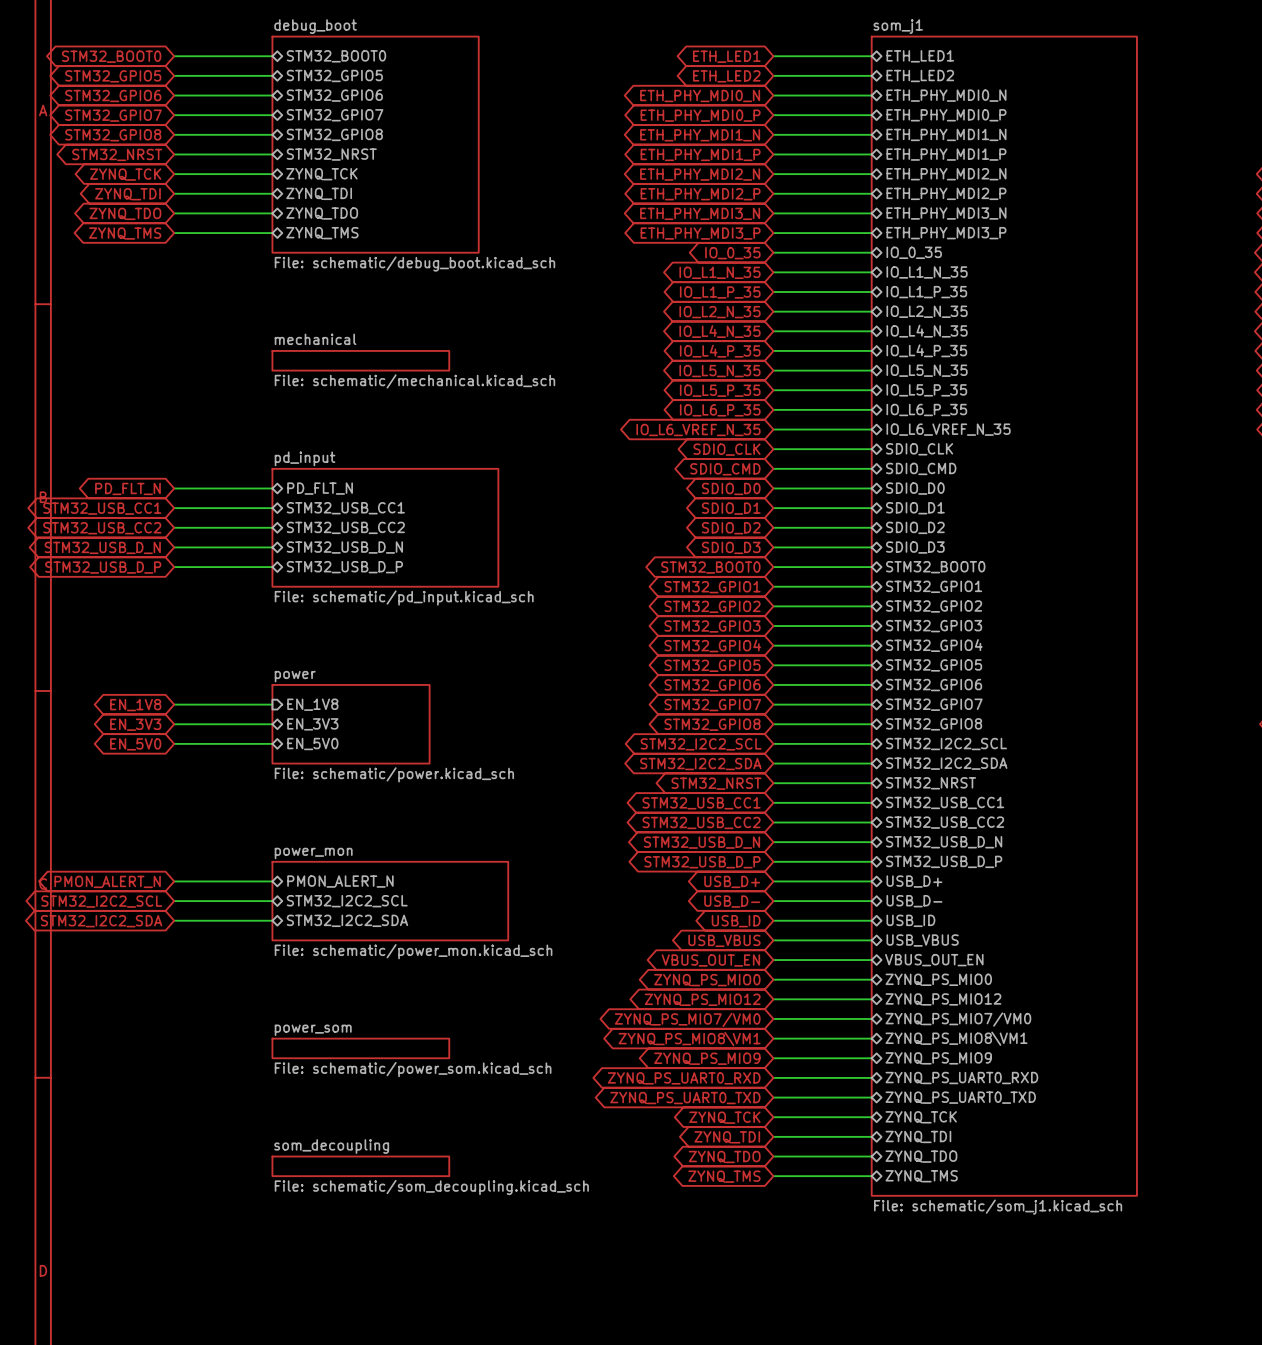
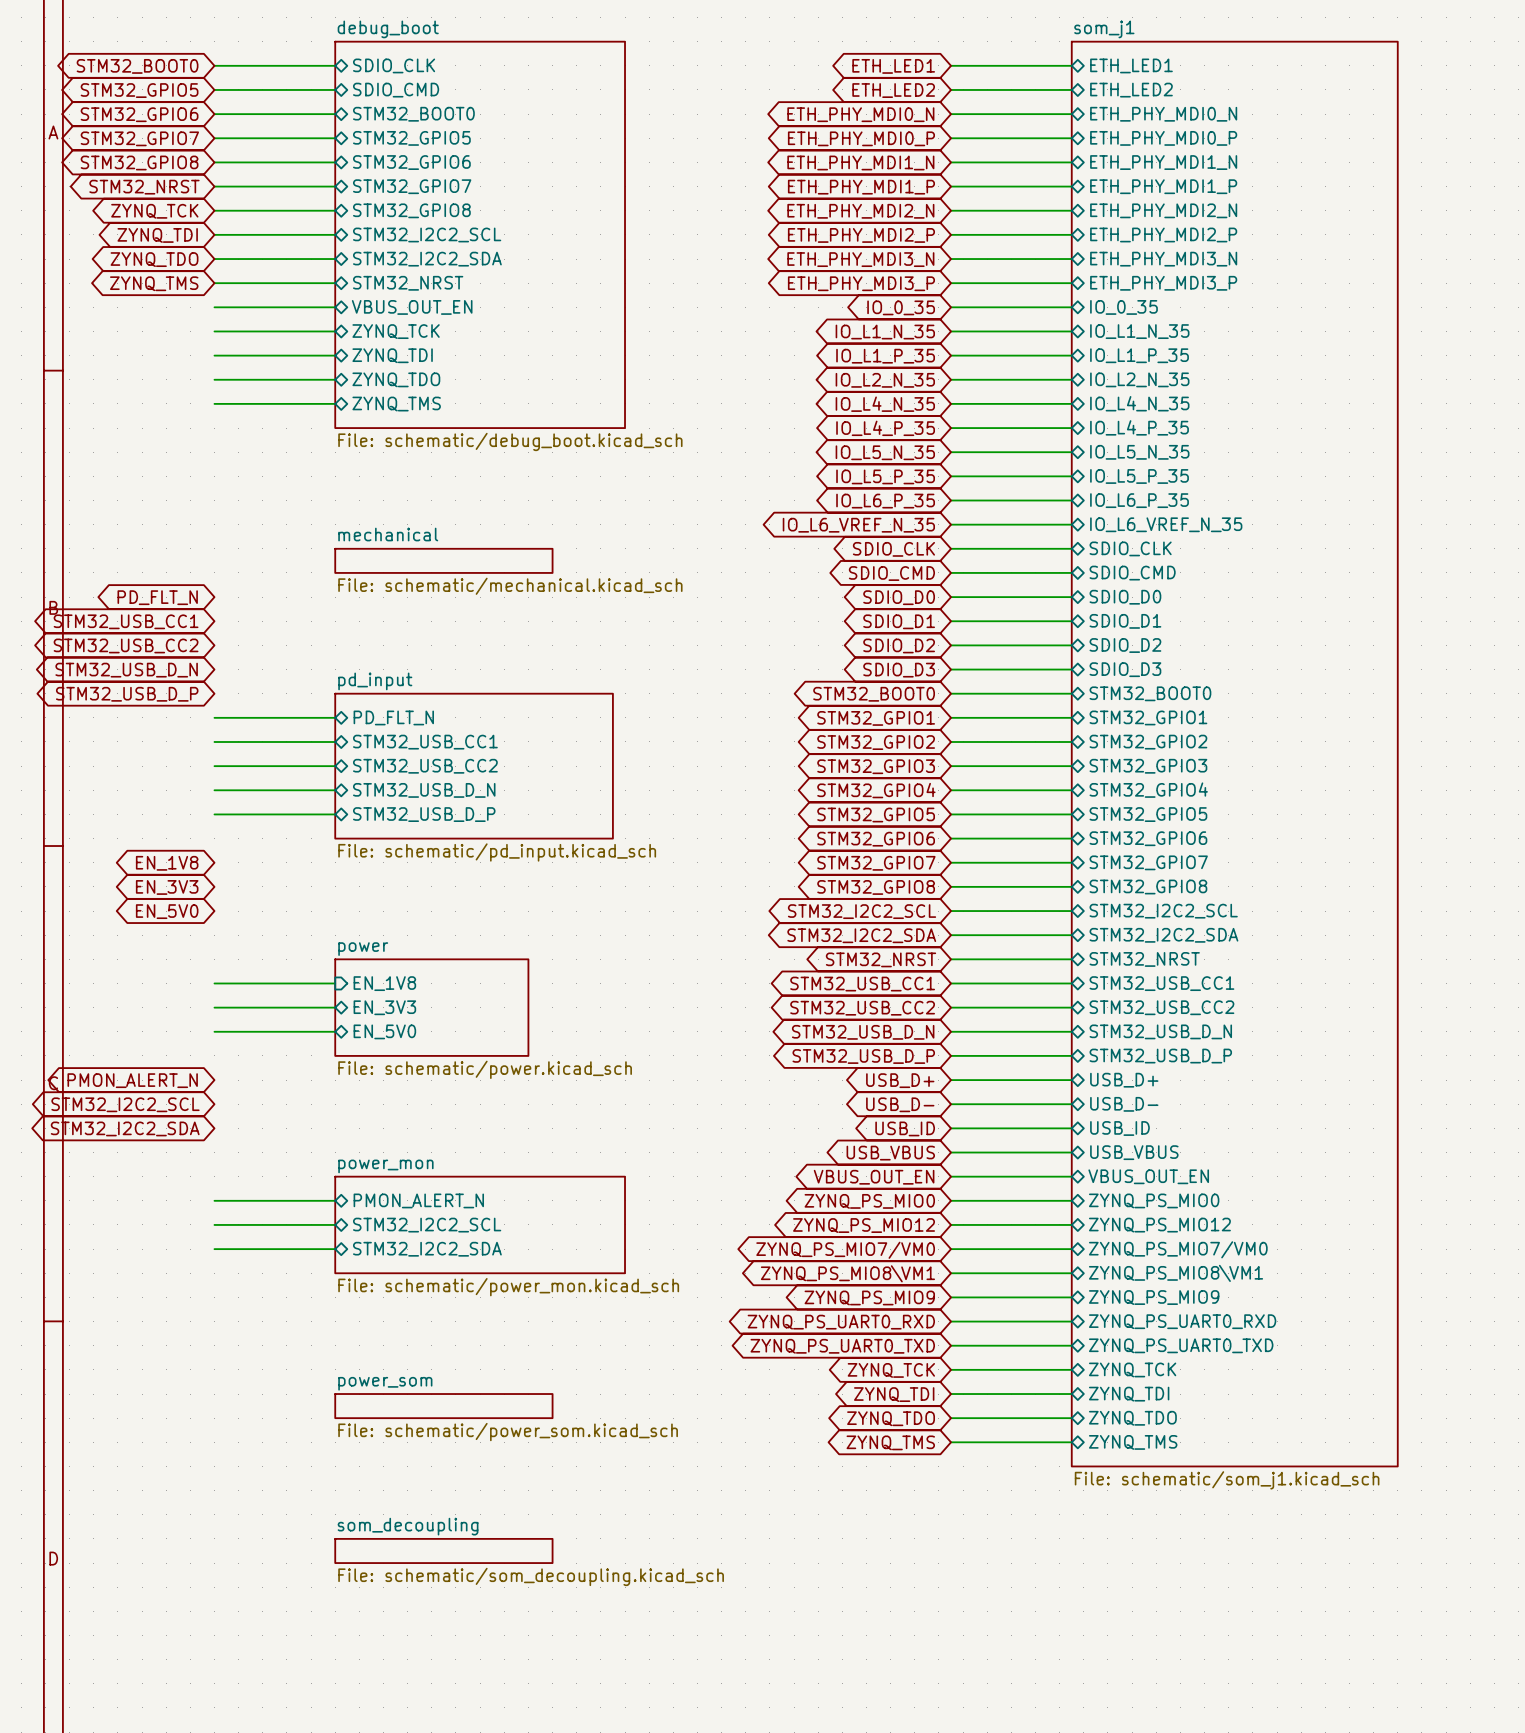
sheet pin: STM32_BOOT0 (336, 56) -> SDIO_CLK (394, 65)
sheet pin: STM32_GPIO5 (334, 75) -> SDIO_CMD (396, 90)
sheet pin: STM32_GPIO6 (334, 95) -> STM32_BOOT0 (413, 114)
sheet pin: STM32_GPIO7 (335, 115) -> STM32_GPIO5 (411, 138)
sheet pin: STM32_GPIO8 (334, 134) -> STM32_GPIO6 (411, 162)
sheet debug_boot: File: schematic/debug_boot.kicad_sch (375, 144) -> none
sheet pin: STM32_NRST (331, 154) -> STM32_GPIO7 (412, 186)
sheet pin: ZYNQ_TCK (321, 174) -> STM32_GPIO8 (411, 210)
sheet pin: ZYNQ_TDI (319, 193) -> STM32_I2C2_SCL (427, 234)
sheet debug_boot: none -> File: schematic/debug_boot.kicad_sch (480, 234)
sheet pin: ZYNQ_TDO (322, 213) -> STM32_I2C2_SDA (427, 259)
sheet pin: ZYNQ_TMS (322, 233) -> STM32_NRST (408, 283)
wire: none -> (214, 307) (335, 307)
sheet pin: none -> VBUS_OUT_EN (412, 307)
wire: none -> (214, 331) (335, 331)
sheet pin: none -> ZYNQ_TCK (396, 331)
wire: none -> (214, 355) (335, 355)
sheet pin: none -> ZYNQ_TDI (392, 355)
wire: none -> (214, 379) (335, 379)
sheet pin: none -> ZYNQ_TDO (396, 379)
wire: none -> (214, 403) (335, 403)
sheet pin: none -> ZYNQ_TMS (396, 404)
sheet mechanical position: (360, 360) -> (443, 560)
wire: (174, 488) (272, 488) -> (214, 717) (335, 717)
sheet pin position: PD_FLT_N (320, 488) -> PD_FLT_N (393, 717)
wire: (174, 508) (272, 508) -> (214, 741) (335, 741)
sheet pin position: STM32_USB_CC1 (345, 508) -> STM32_USB_CC1 (425, 742)
wire: (174, 527) (272, 527) -> (214, 766) (335, 766)
sheet pin position: STM32_USB_CC2 (345, 527) -> STM32_USB_CC2 (425, 766)
sheet pd_input position: (385, 527) -> (474, 766)
wire: (174, 547) (272, 547) -> (214, 790) (335, 790)
sheet pin position: STM32_USB_D_N (344, 547) -> STM32_USB_D_N (424, 790)
wire: (174, 567) (272, 567) -> (214, 814) (335, 814)
sheet pin position: STM32_USB_D_P (344, 567) -> STM32_USB_D_P (424, 814)
wire: (174, 704) (272, 704) -> (214, 983) (335, 983)
sheet pin position: EN_1V8 (312, 704) -> EN_1V8 (384, 983)
wire: (174, 724) (272, 724) -> (214, 1007) (335, 1007)
sheet pin position: EN_3V3 (312, 724) -> EN_3V3 (384, 1007)
sheet power position: (351, 724) -> (431, 1007)
wire: (174, 743) (272, 743) -> (214, 1031) (335, 1031)
sheet pin position: EN_5V0 (312, 744) -> EN_5V0 (384, 1031)
wire: (174, 881) (272, 881) -> (214, 1200) (335, 1200)
sheet pin position: PMON_ALERT_N (340, 881) -> PMON_ALERT_N (418, 1200)
wire: (174, 901) (272, 901) -> (214, 1224) (335, 1224)
sheet pin position: STM32_I2C2_SCL (347, 901) -> STM32_I2C2_SCL (427, 1225)
sheet power_mon position: (390, 901) -> (480, 1224)
wire: (174, 920) (272, 920) -> (214, 1249) (335, 1249)
sheet pin position: STM32_I2C2_SDA (347, 920) -> STM32_I2C2_SDA (427, 1249)
sheet power_som position: (360, 1048) -> (443, 1406)
sheet som_decoupling position: (360, 1166) -> (443, 1550)

